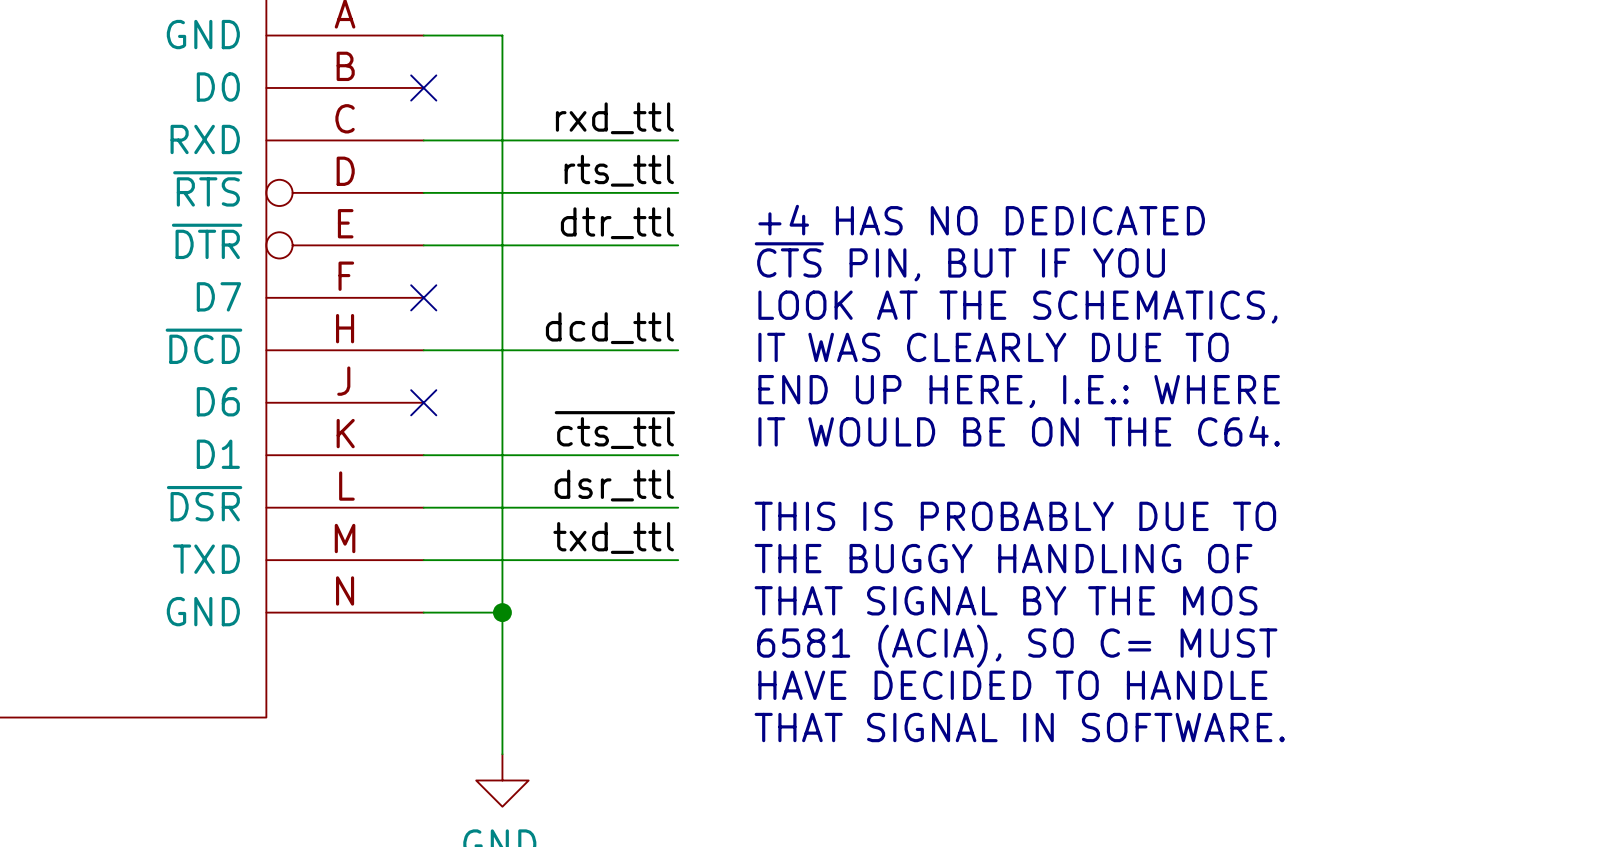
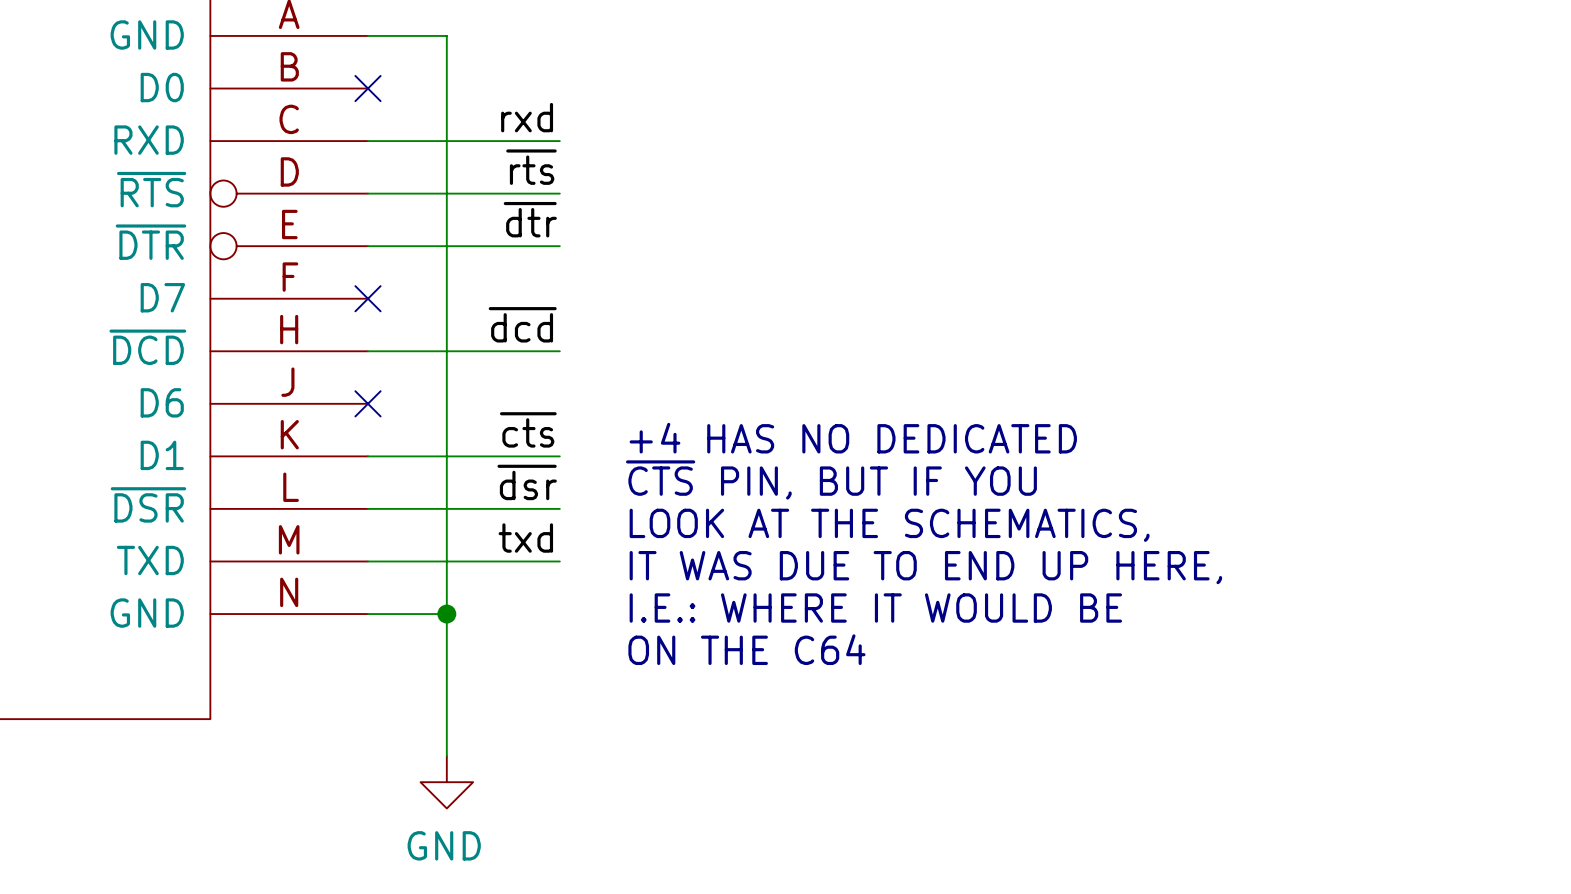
label: none -> rxd (527, 117)
label: rxd_ttl (614, 118) -> none
wire: (615, 140) (678, 140) -> none
label: none -> ~{rts} (531, 167)
label: rts_ttl (619, 170) -> none
wire: (615, 192) (678, 192) -> none
label: none -> ~{dtr} (530, 219)
text position: +4 HAS NO DEDICATED (981, 220) -> +4 HAS NO DEDICATED (853, 438)
label: dtr_ttl (617, 223) -> none
wire: (615, 245) (678, 245) -> none
text position: ~{CTS} PIN, BUT IF YOU (959, 261) -> ~{CTS} PIN, BUT IF YOU (831, 479)
text position: LOOK AT THE SCHEMATICS, (1017, 307) -> LOOK AT THE SCHEMATICS, (889, 525)
label: none -> ~{dcd} (522, 324)
label: dcd_ttl (609, 328) -> none
text: IT WAS CLEARLY DUE TO (993, 347) -> none
wire: (615, 350) (678, 350) -> none
text: END UP HERE, I.E.: WHERE (1019, 391) -> none
label: ~{cts_ttl} (614, 430) -> ~{cts} (528, 429)
text: IT WOULD BE ON THE C64. (1019, 431) -> none
wire: (615, 455) (678, 455) -> none
label: none -> ~{dsr} (527, 482)
label: dsr_ttl (614, 485) -> none
wire: (615, 507) (678, 507) -> none
text: THIS IS PROBABLY DUE TO (1015, 516) -> none
label: none -> txd (525, 538)
label: txd_ttl (613, 537) -> none
text: THE BUGGY HANDLING OF (1003, 558) -> none
wire: (615, 560) (678, 560) -> none
text: none -> IT WAS DUE TO END UP HERE, (925, 567)
text: THAT SIGNAL BY THE MOS (1006, 600) -> none
text: none -> I.E.: WHERE IT WOULD BE (875, 608)
text: 6581 (ACIA), SO C= MUST (1017, 646) -> none
text: none -> ON THE C64 (746, 649)
text: HAVE DECIDED TO HANDLE (1012, 685) -> none
text: THAT SIGNAL IN SOFTWARE. (1019, 727) -> none

